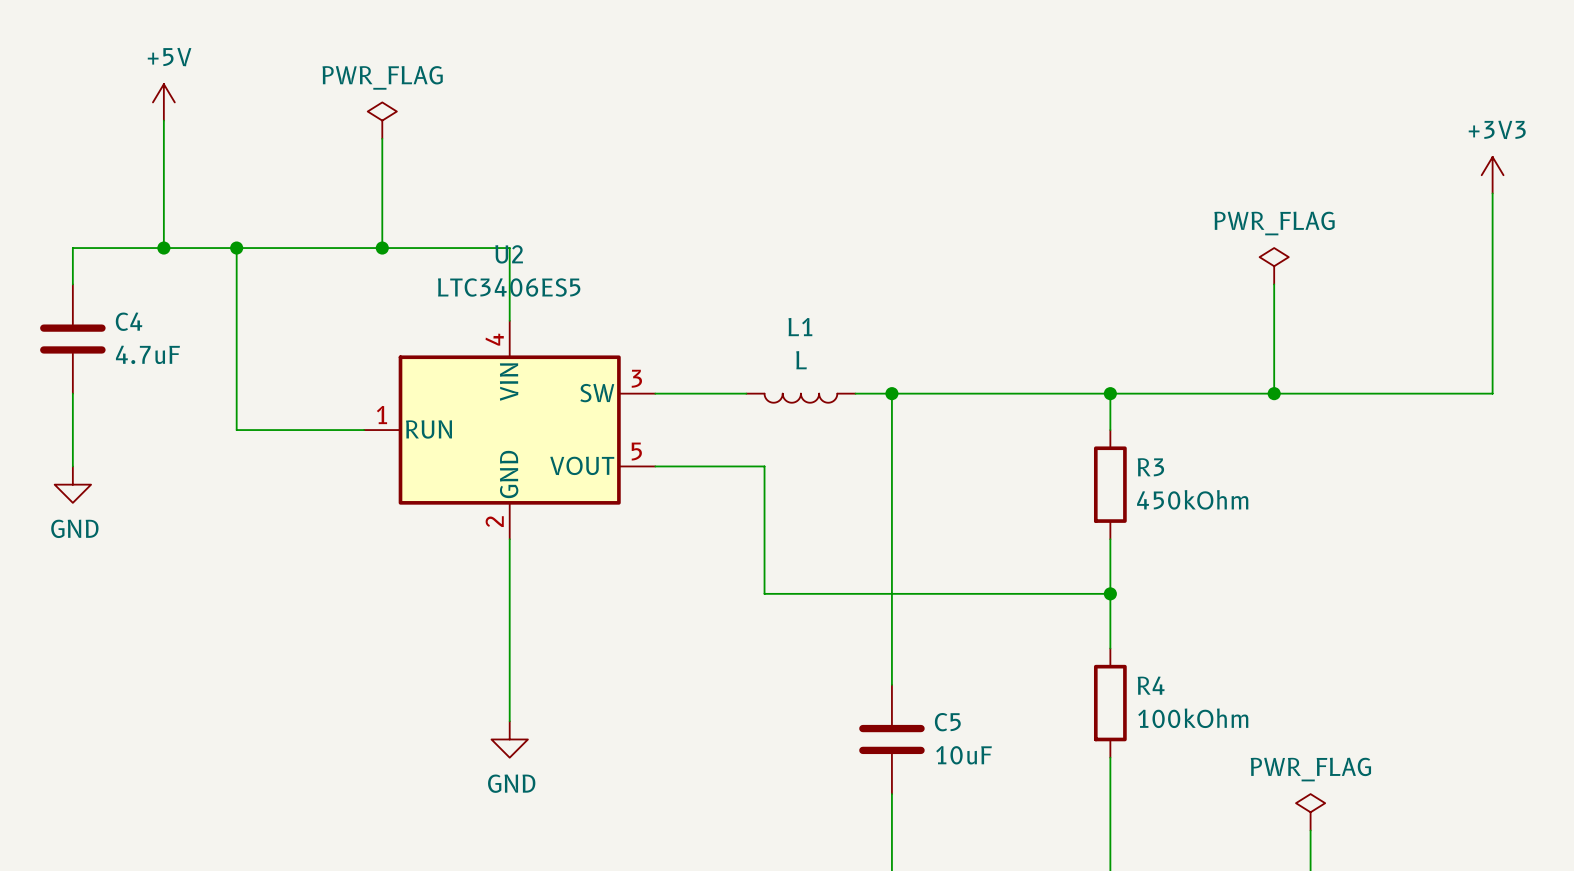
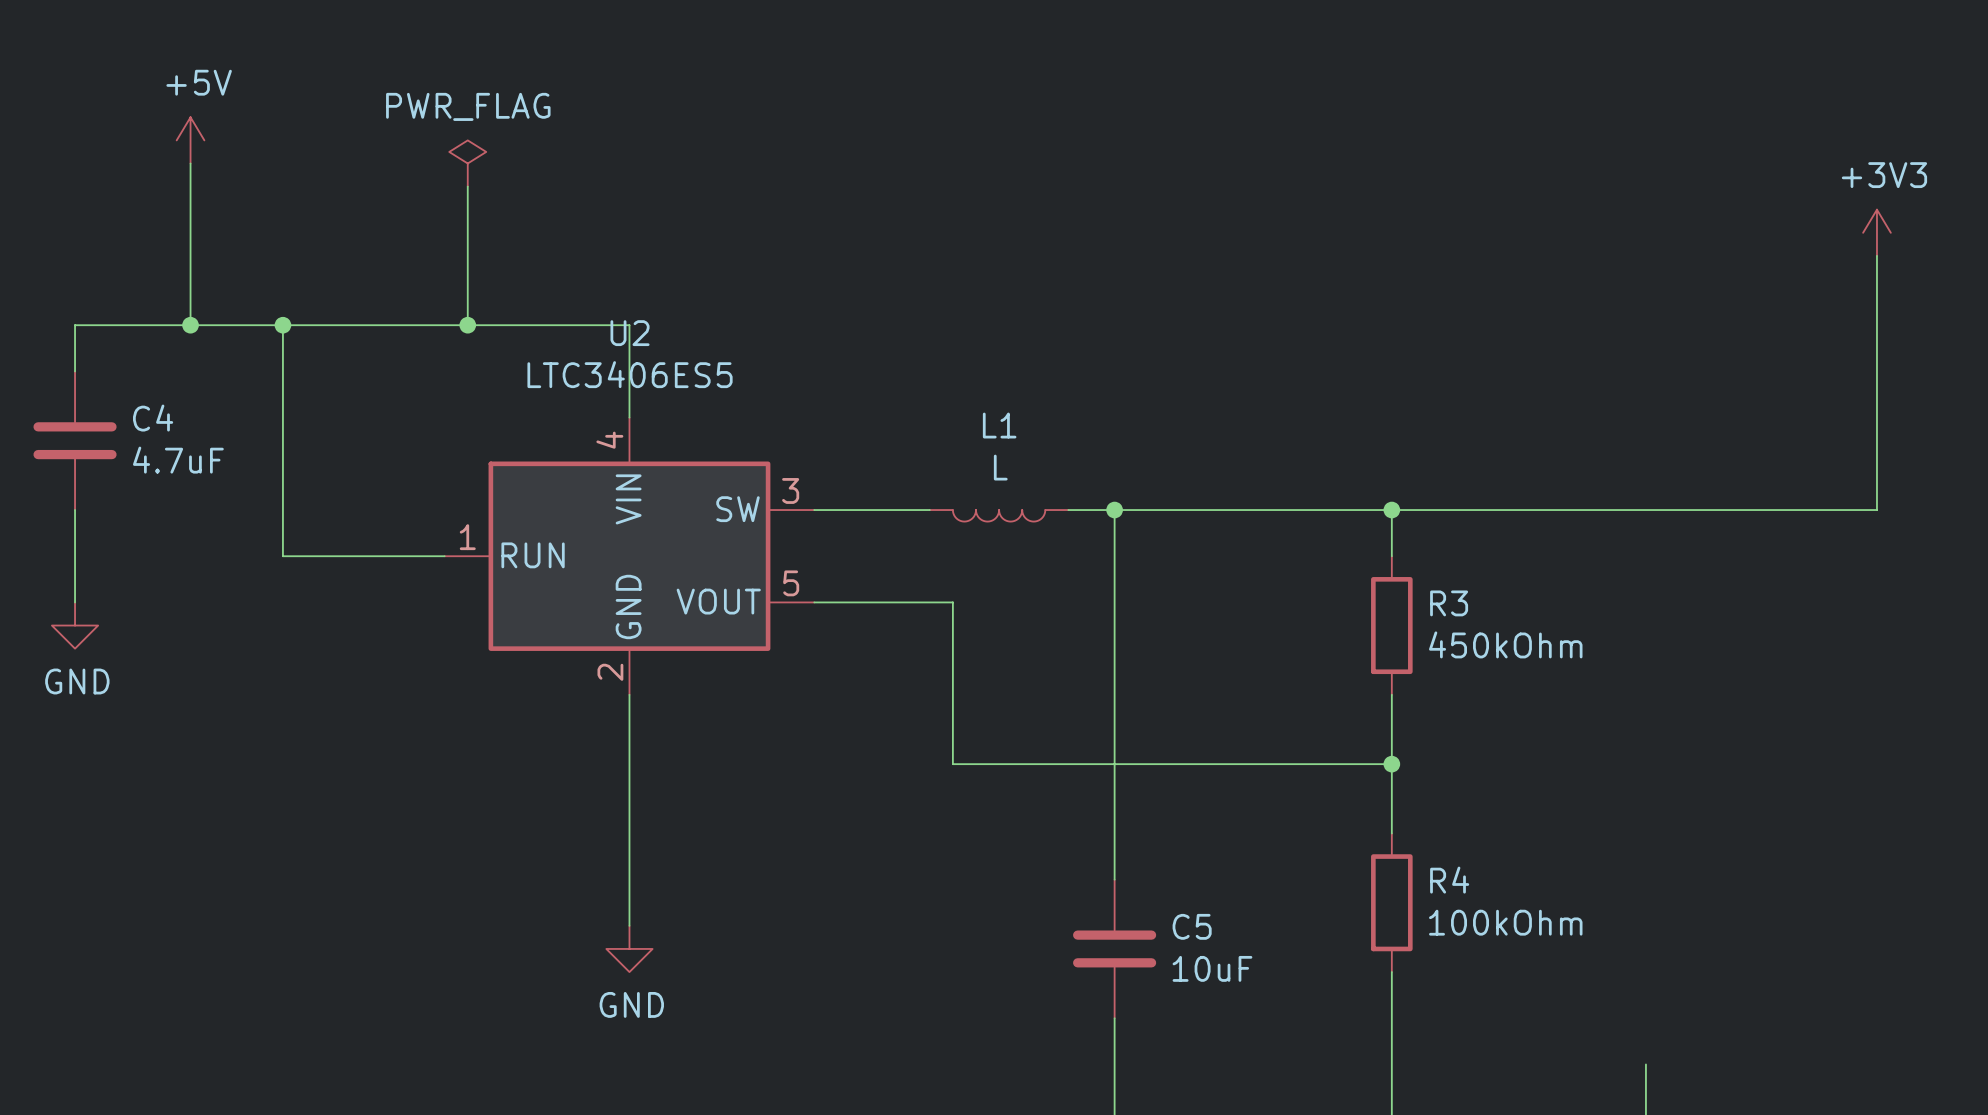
power symbol: PWR_FLAG (1274, 266) -> none
wire: (1274, 284) (1274, 393) -> none
junction: (1274, 393) -> none
power symbol: PWR_FLAG (1310, 812) -> none

